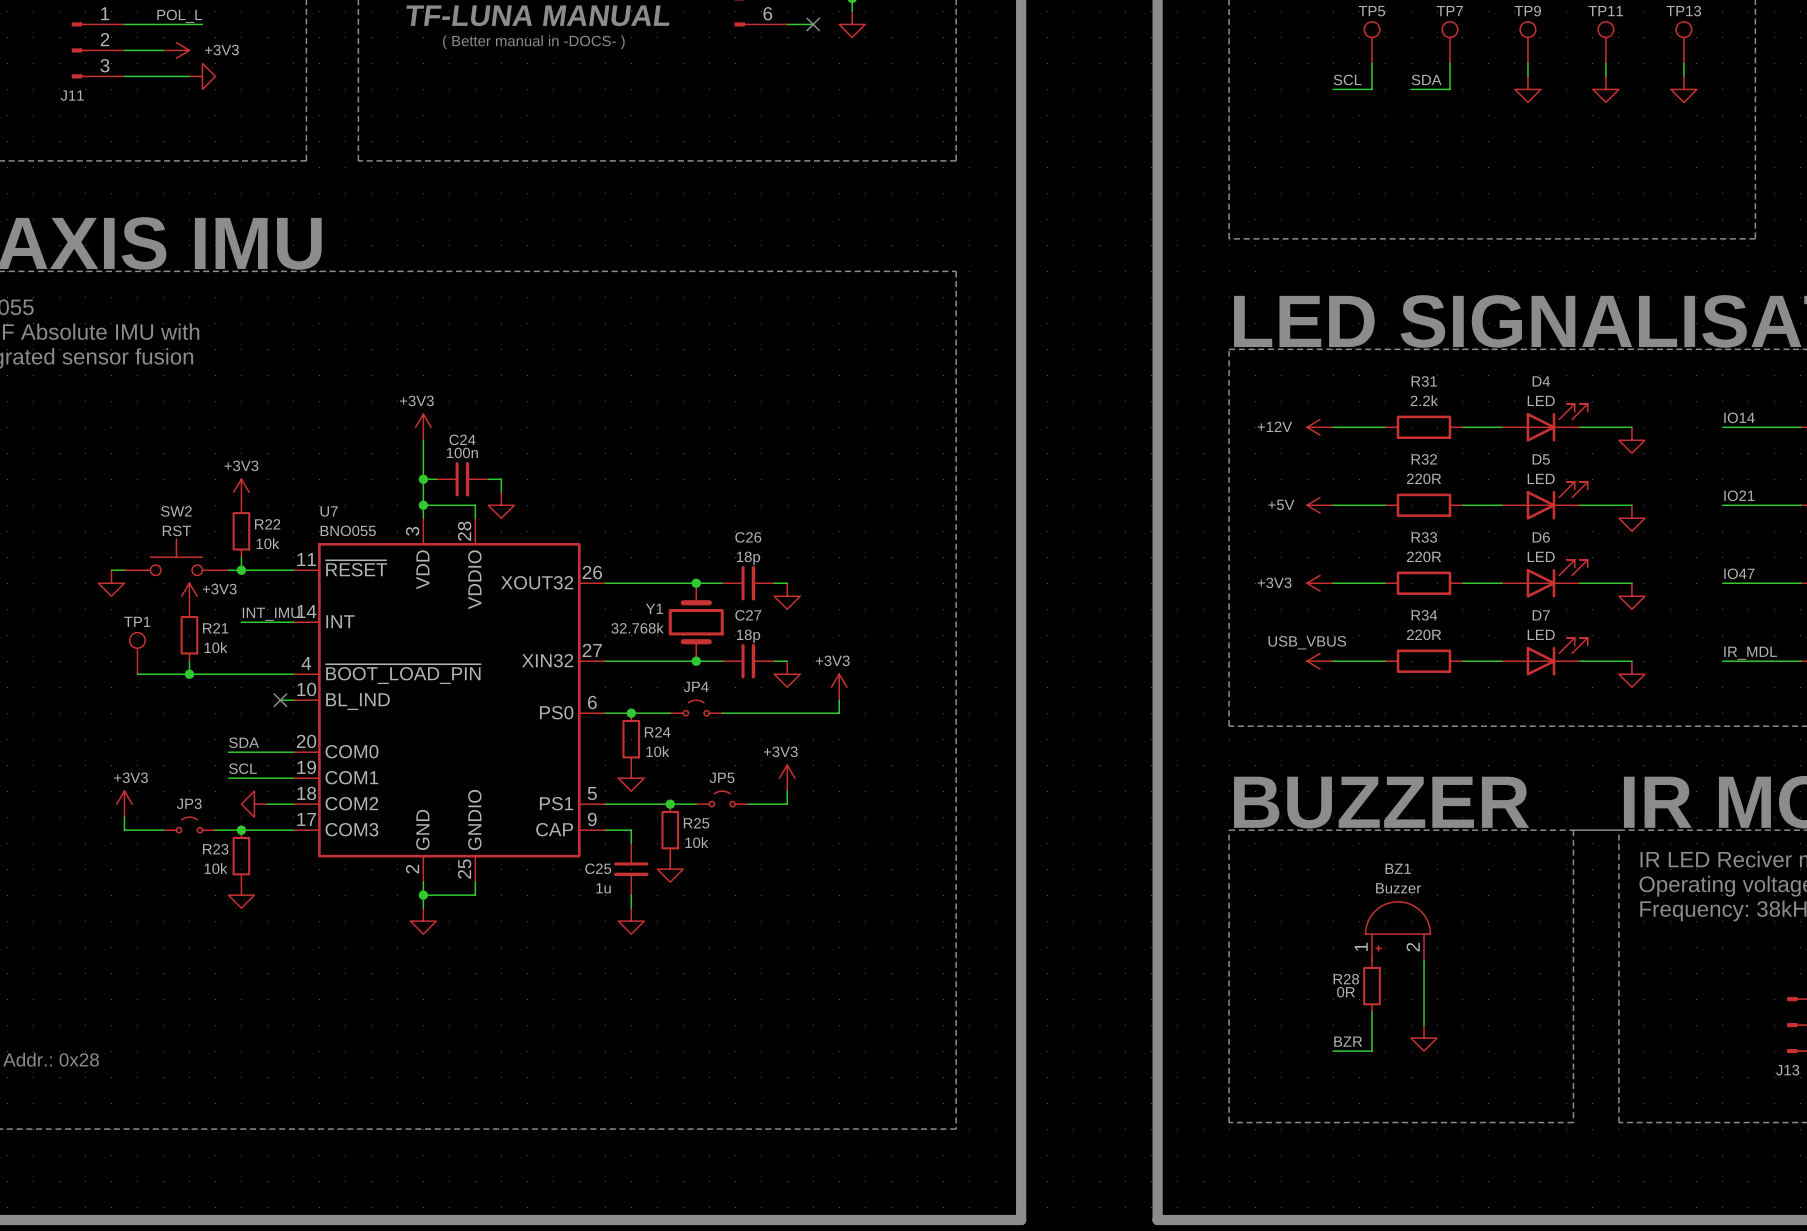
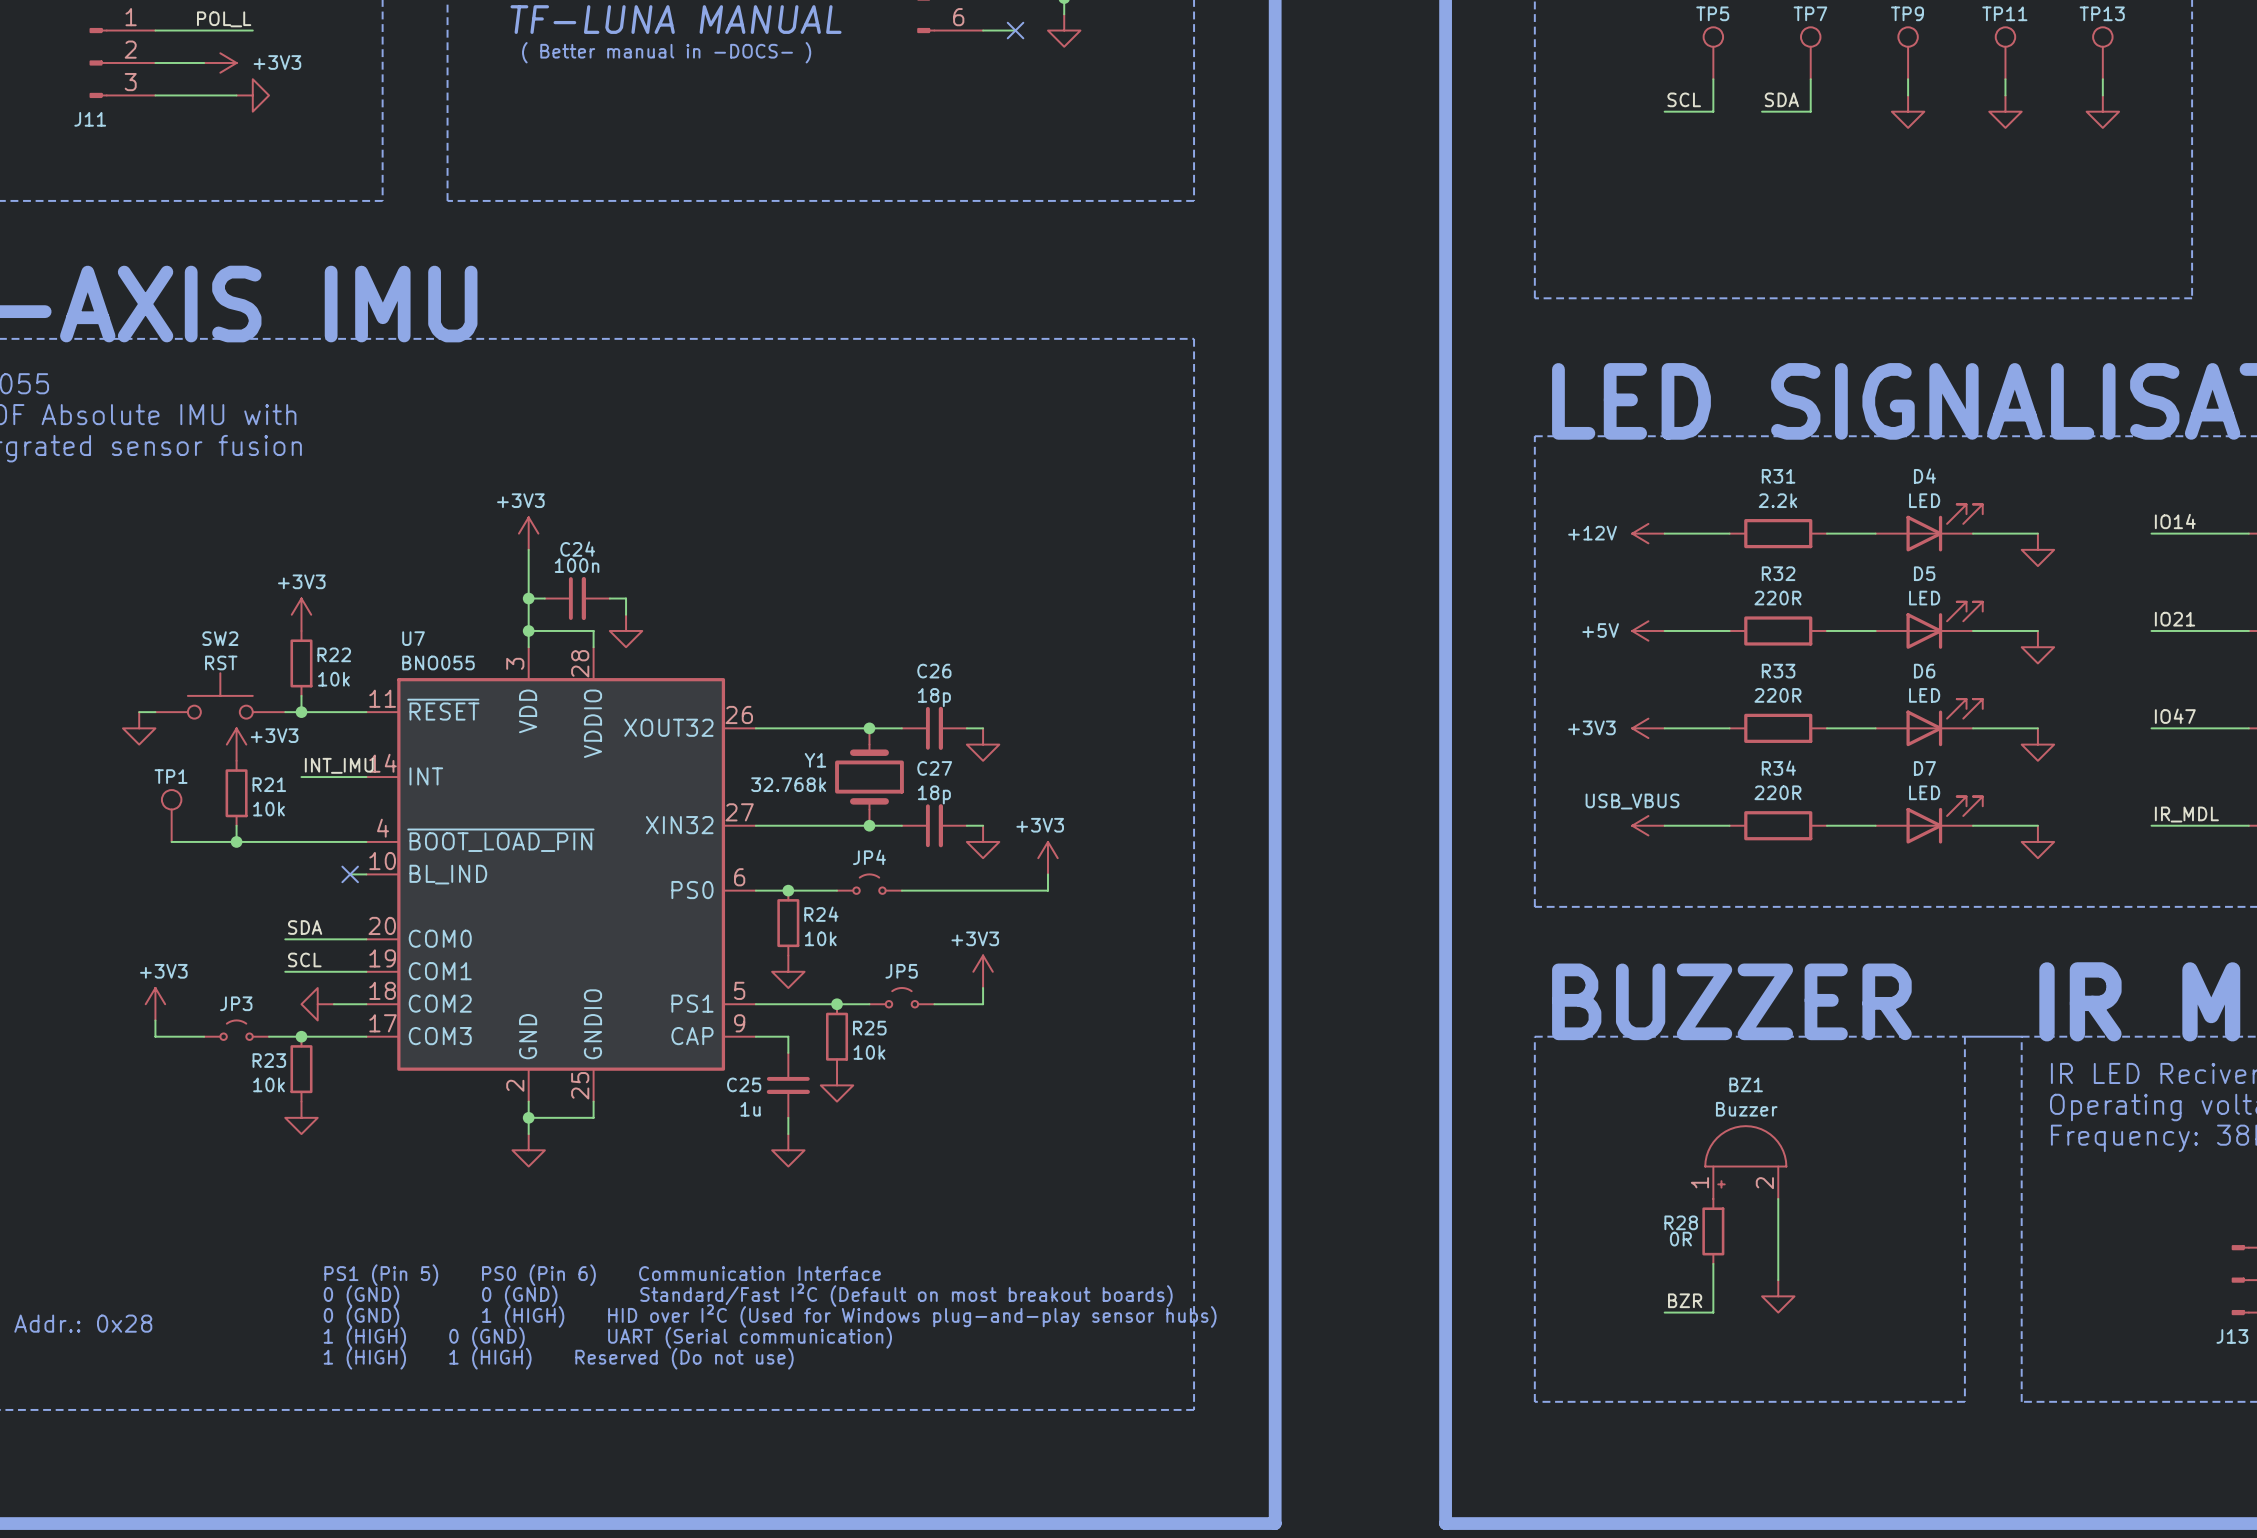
text: none -> PS1 (Pin 5) PS0 (Pin 6) Communication Interface (602, 1275)
text: none -> 0 (GND) 0 (GND) Standard/Fast I²C (Default on most breakout boards) (748, 1295)
text: none -> 0 (GND) 1 (HIGH) HID over I²C (Used for Windows plug-and-play sensor hubs) (770, 1316)
text: none -> 1 (HIGH) 0 (GND) UART (Serial communication) (607, 1337)
text: none -> 1 (HIGH) 1 (HIGH) Reserved (Do not use) (558, 1358)

